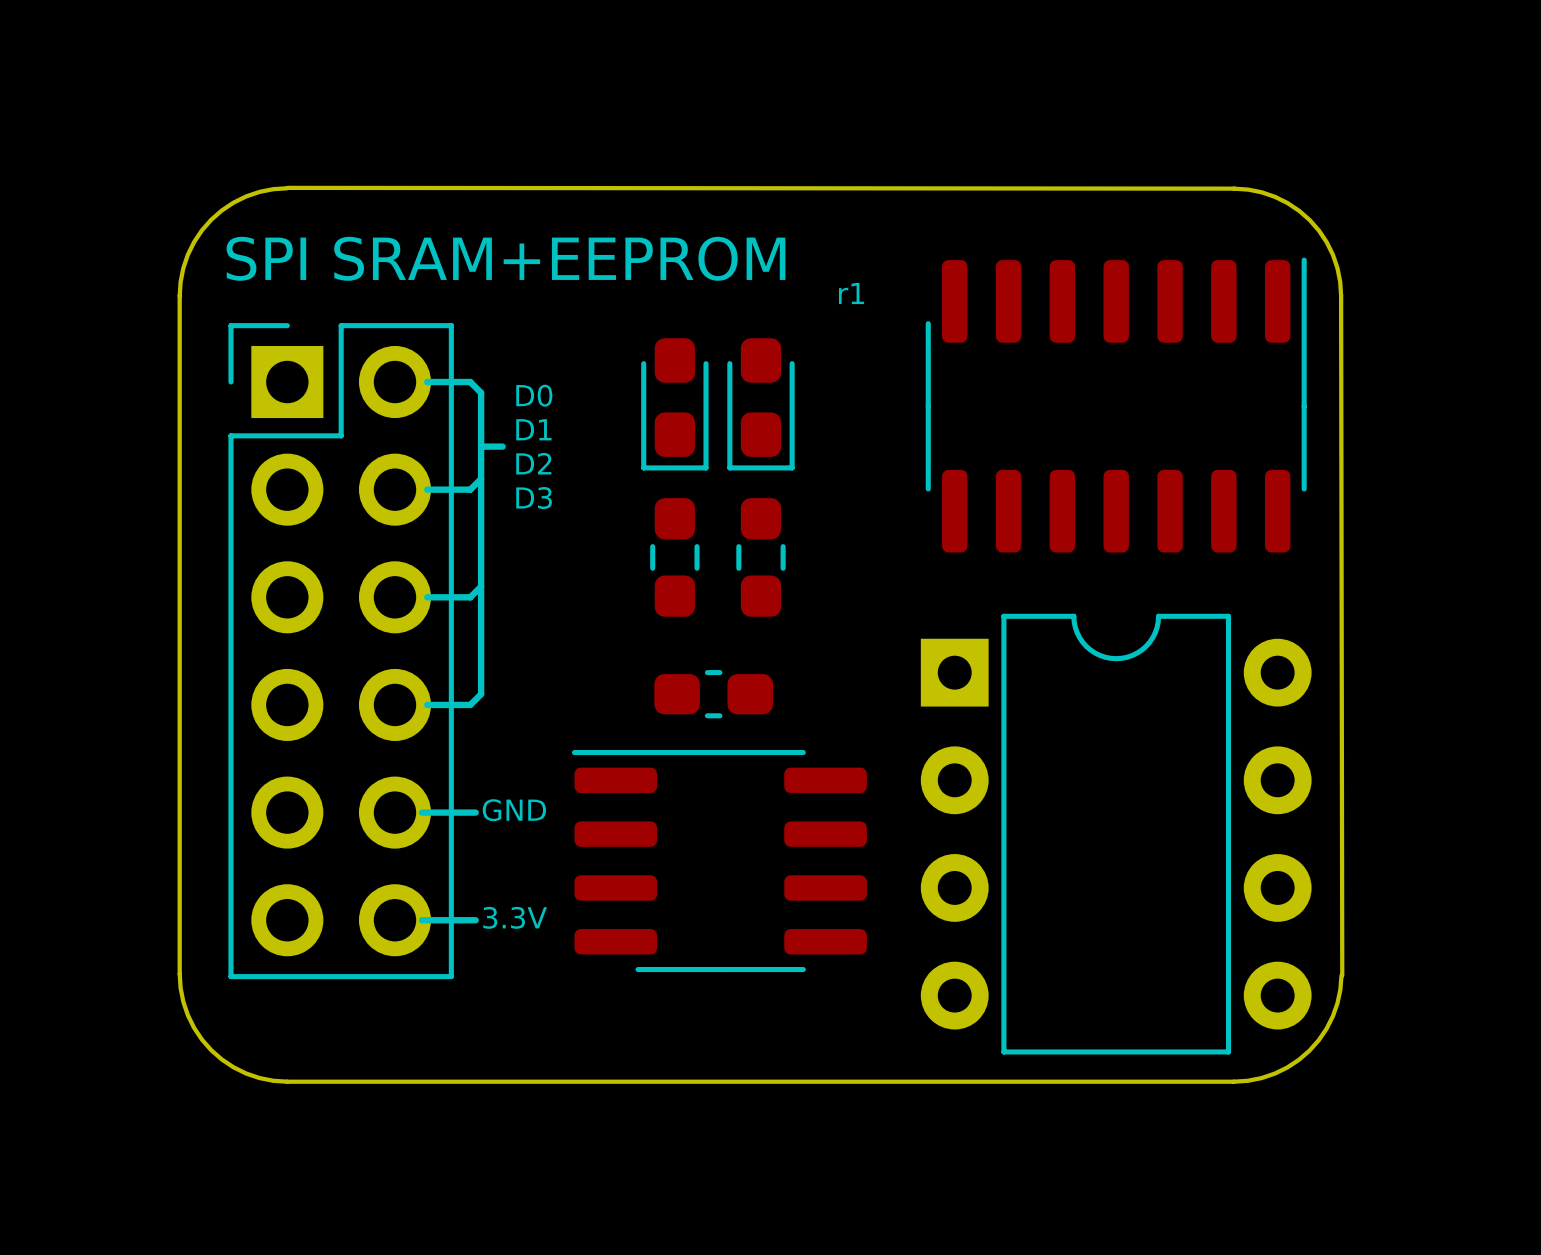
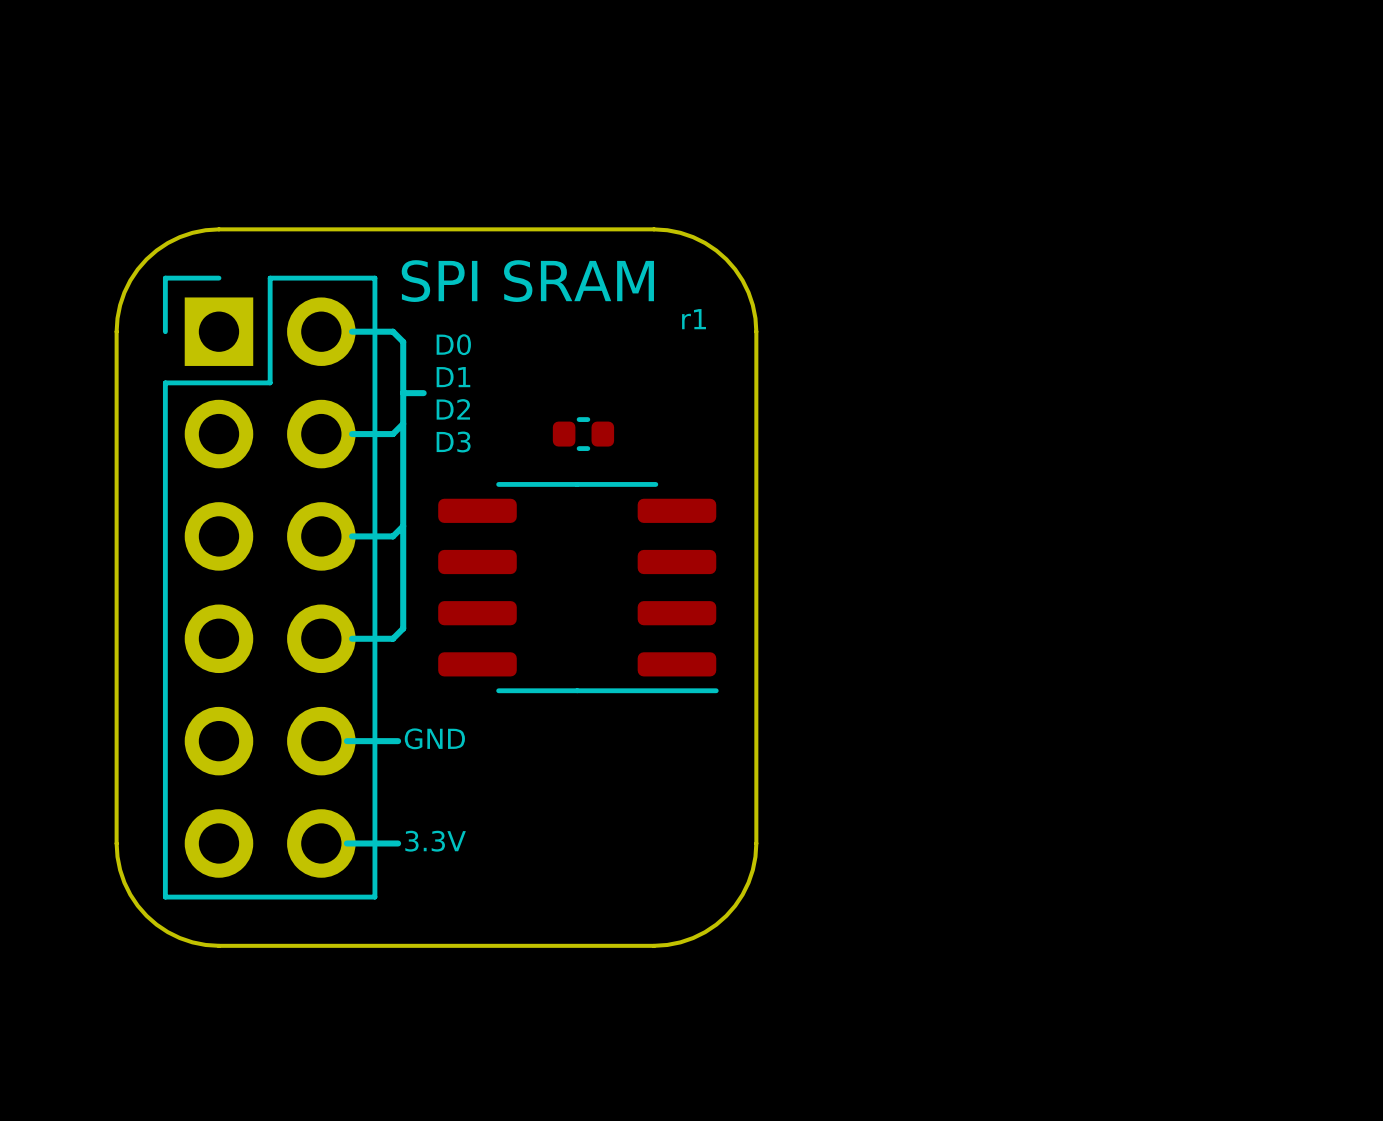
board edge: (287, 187) (1234, 188) (1248, 189) (1275, 196) (1299, 210) (1319, 230) (1332, 254) (1340, 281) (1341, 295) (1342, 975) -> none
board edge: (287, 188) (259, 191) (233, 202) (211, 219) (194, 242) (187, 254) (180, 281) (179, 382) -> (116, 843) (120, 869) (124, 882) (137, 905) (146, 915) (167, 932) (179, 938) (205, 944) (218, 945) (667, 944) (680, 942) (705, 932) (726, 915) (742, 894) (748, 882) (752, 869) (756, 843) (755, 318) (748, 292) (742, 280) (726, 259) (716, 250) (693, 237) (667, 230) (653, 229) (205, 230) (179, 237) (167, 243) (156, 250) (137, 269) (124, 292) (117, 318) (116, 331)
text: SPI SRAM+EEPROM (505, 258) -> SPI SRAM (527, 281)
text position: r1 (851, 293) -> r1 (694, 319)
part: (674, 404) -> none
part: (760, 404) -> none
part: (1116, 405) -> none
part: none -> (583, 434)
part: (674, 557) -> none
part: (760, 557) -> none
part: (713, 694) -> none
part: (1116, 834) -> none
part rotation: 0° (719, 861) -> 180° (578, 587)
part position: (719, 861) -> (578, 587)
board edge: (179, 920) (180, 988) (183, 1001) (194, 1027) (211, 1050) (233, 1067) (259, 1078) (287, 1081) (1247, 1080) (1261, 1078) (1287, 1067) (1309, 1050) (1318, 1040) (1332, 1016) (1337, 1003) (1341, 975) -> none

